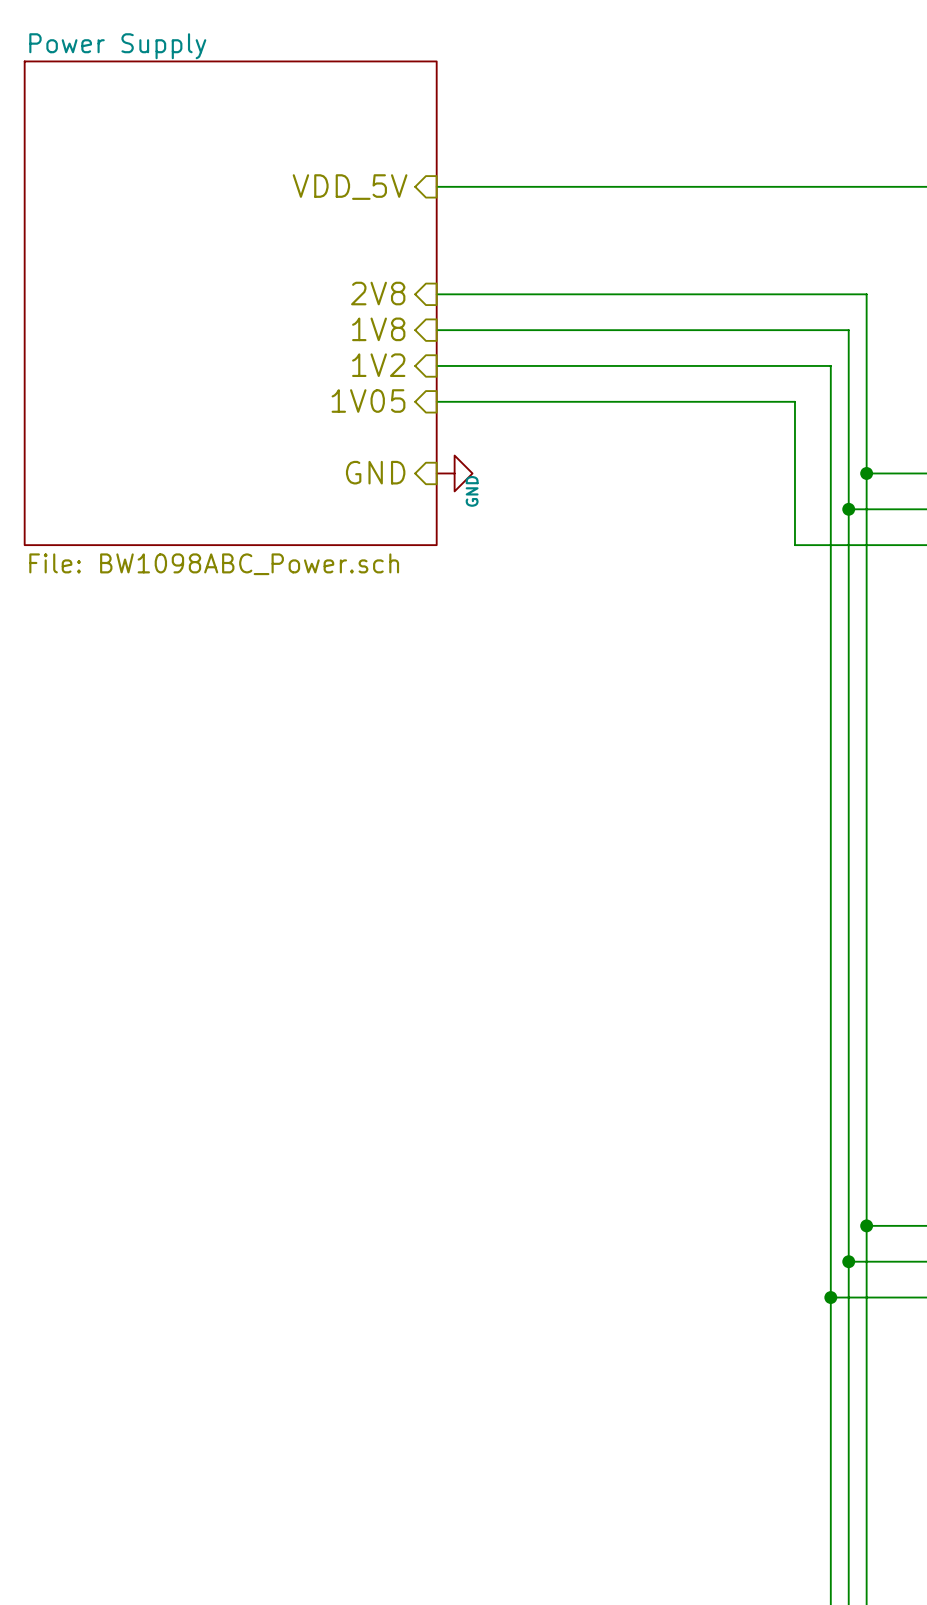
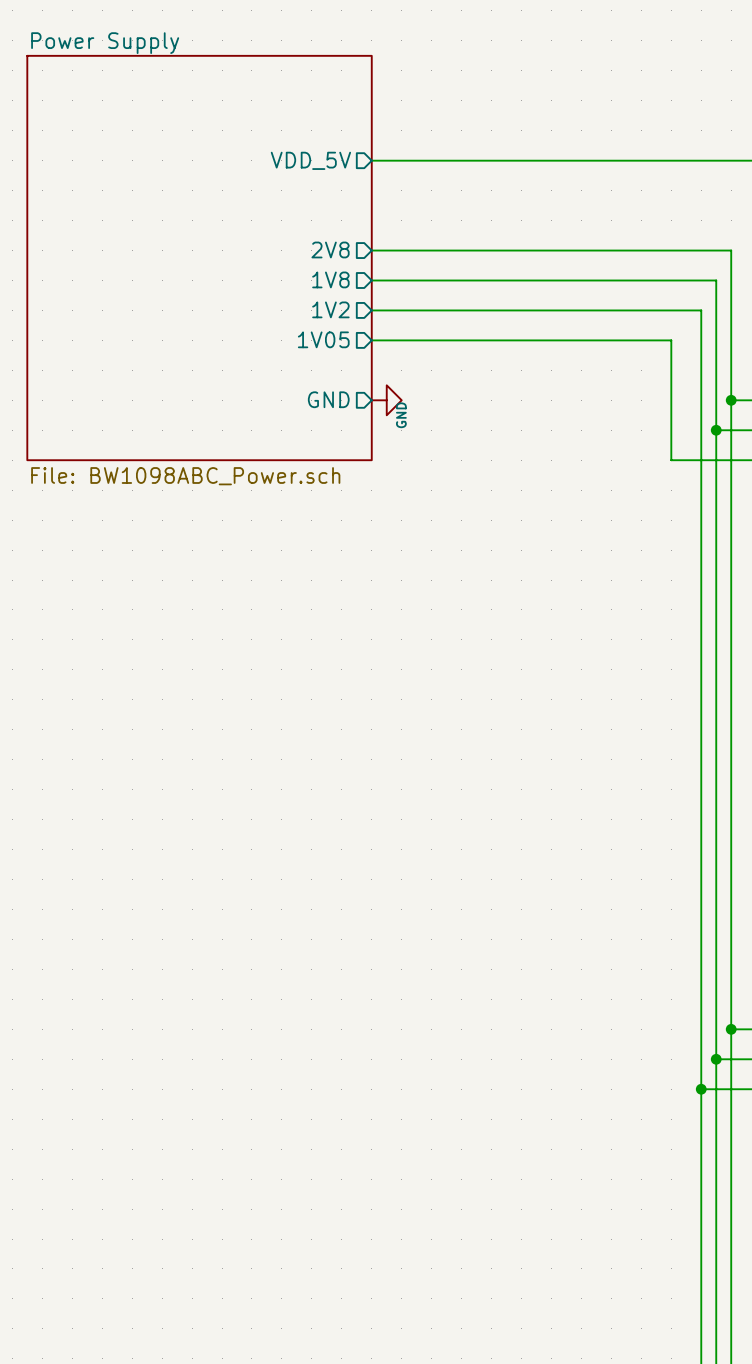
hierarchical label: VDD_5V (350, 187) -> none
sheet pin: none -> VDD_5V (310, 160)
hierarchical label: 2V8 (378, 293) -> none
sheet pin: none -> 2V8 (330, 249)
hierarchical label: 1V8 (378, 329) -> none
sheet pin: none -> 1V8 (330, 279)
hierarchical label: 1V2 (378, 365) -> none
sheet pin: none -> 1V2 (330, 309)
hierarchical label: 1V05 (368, 401) -> none
sheet pin: none -> 1V05 (323, 339)
hierarchical label: GND (375, 472) -> none
sheet pin: none -> GND (328, 399)

